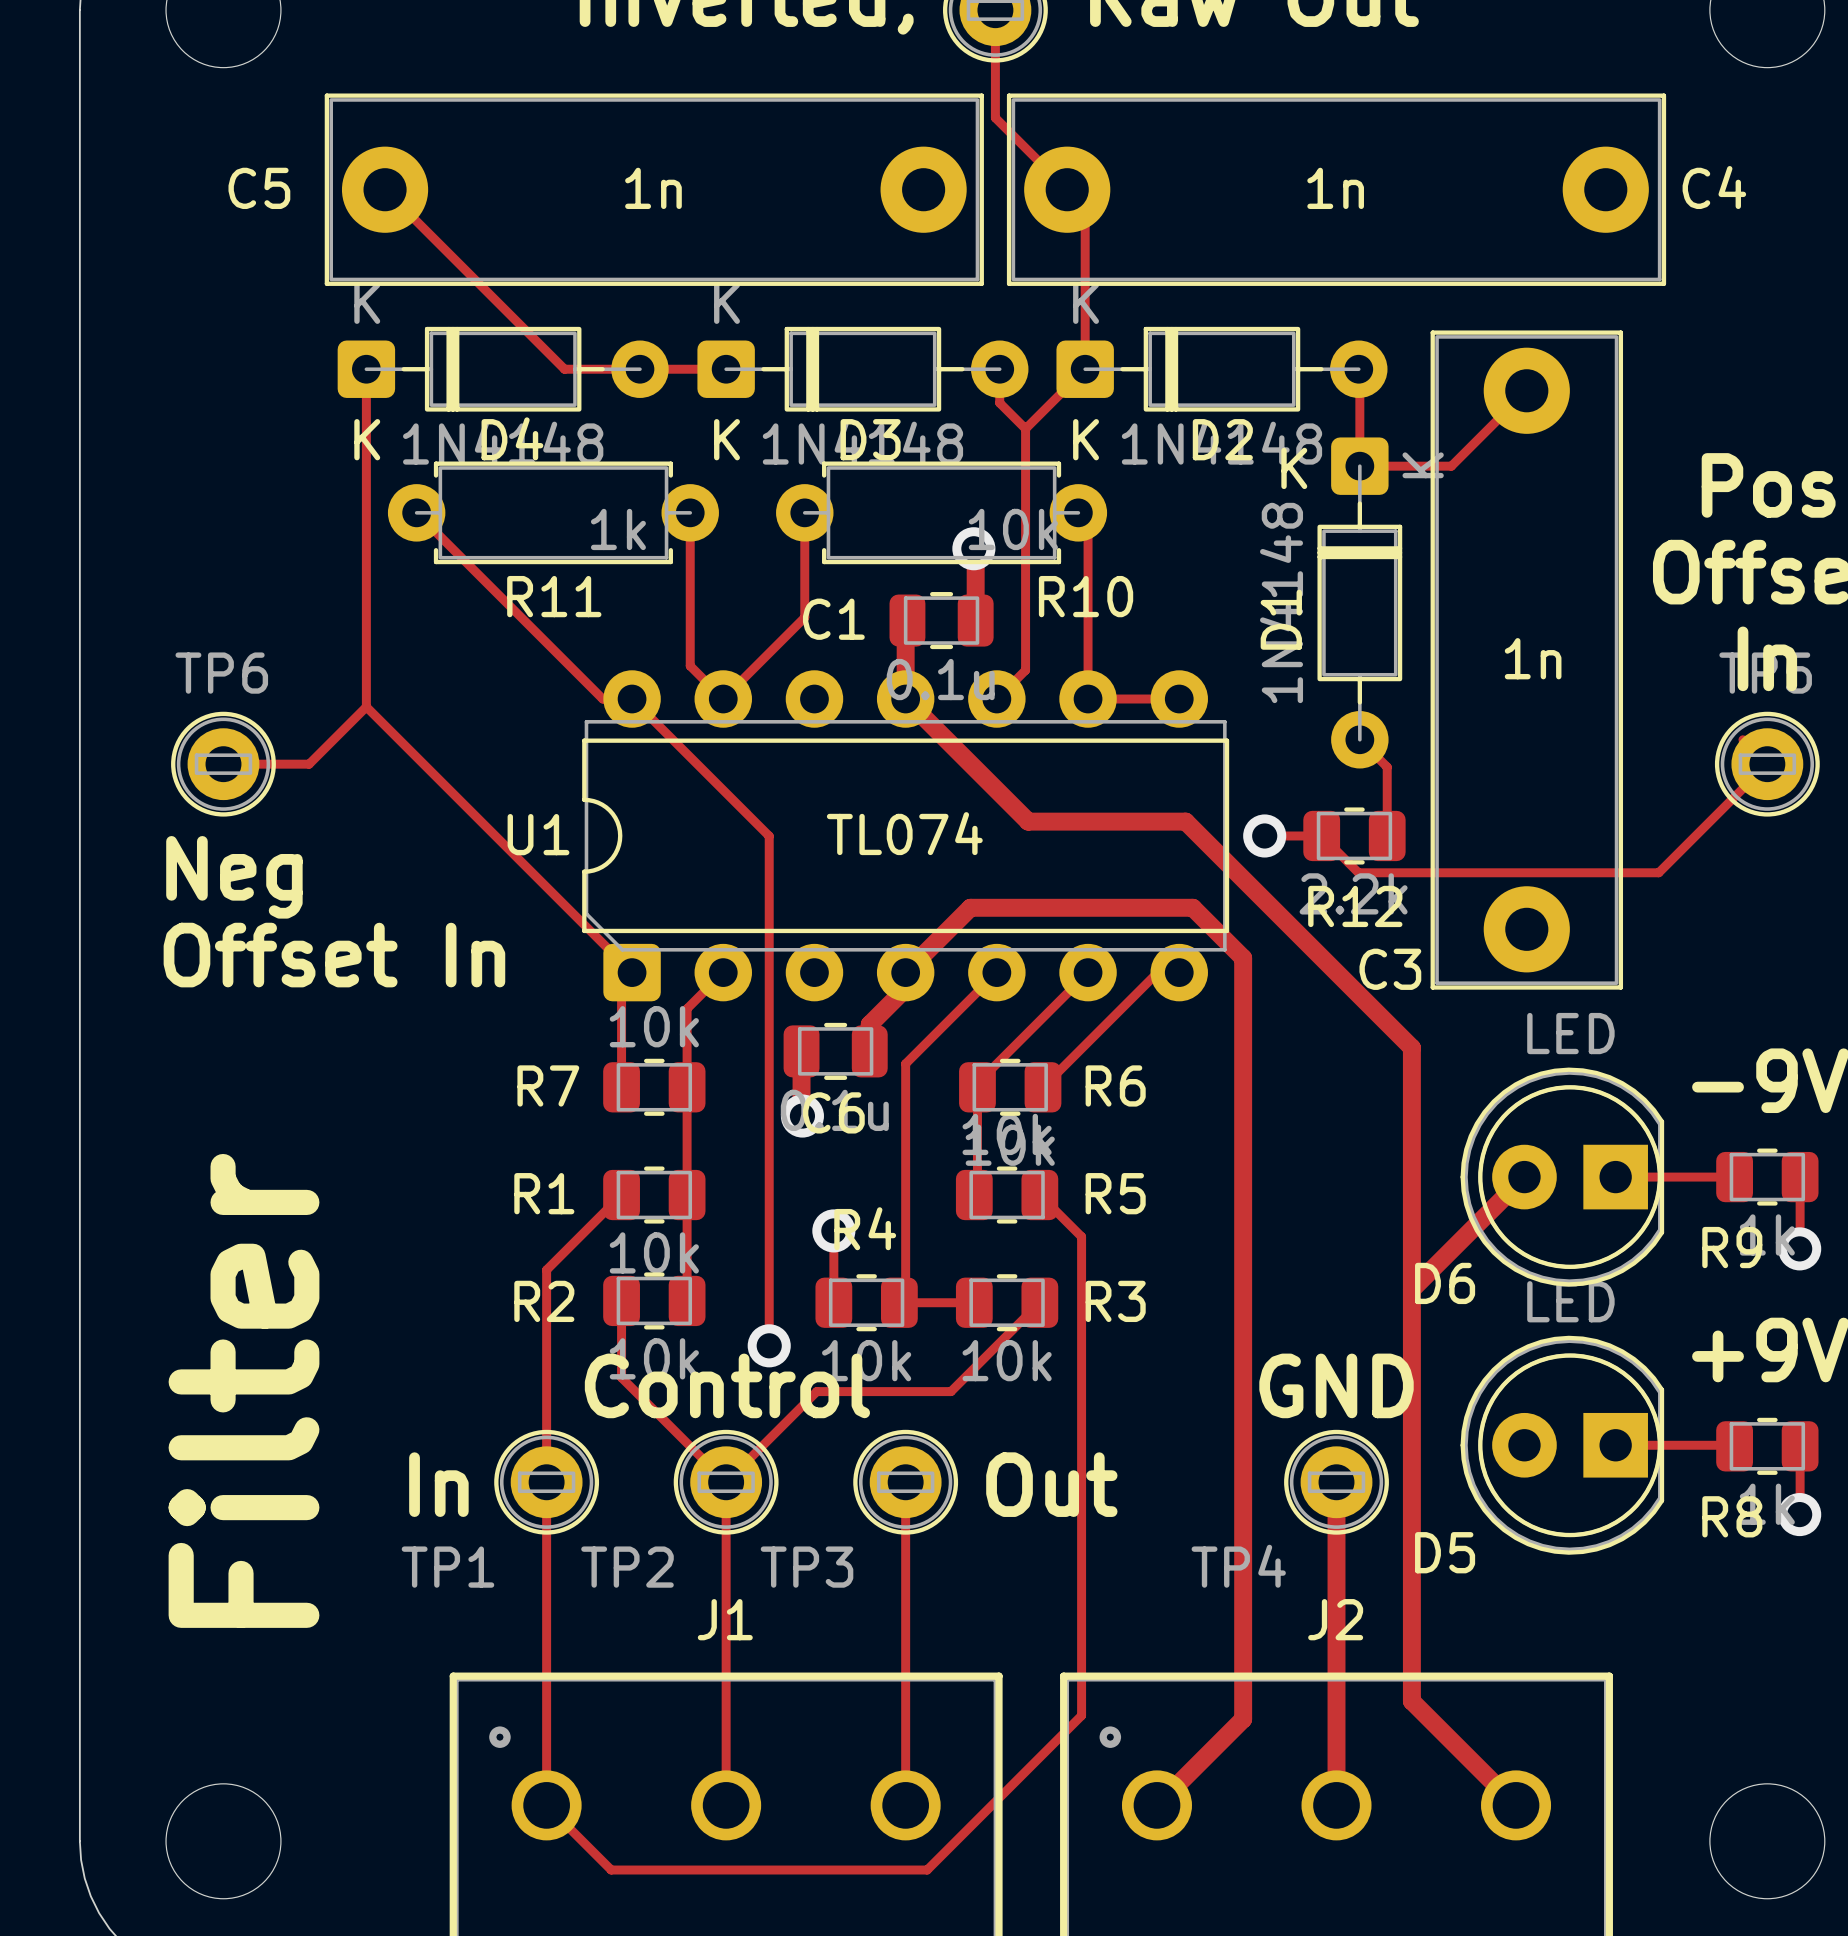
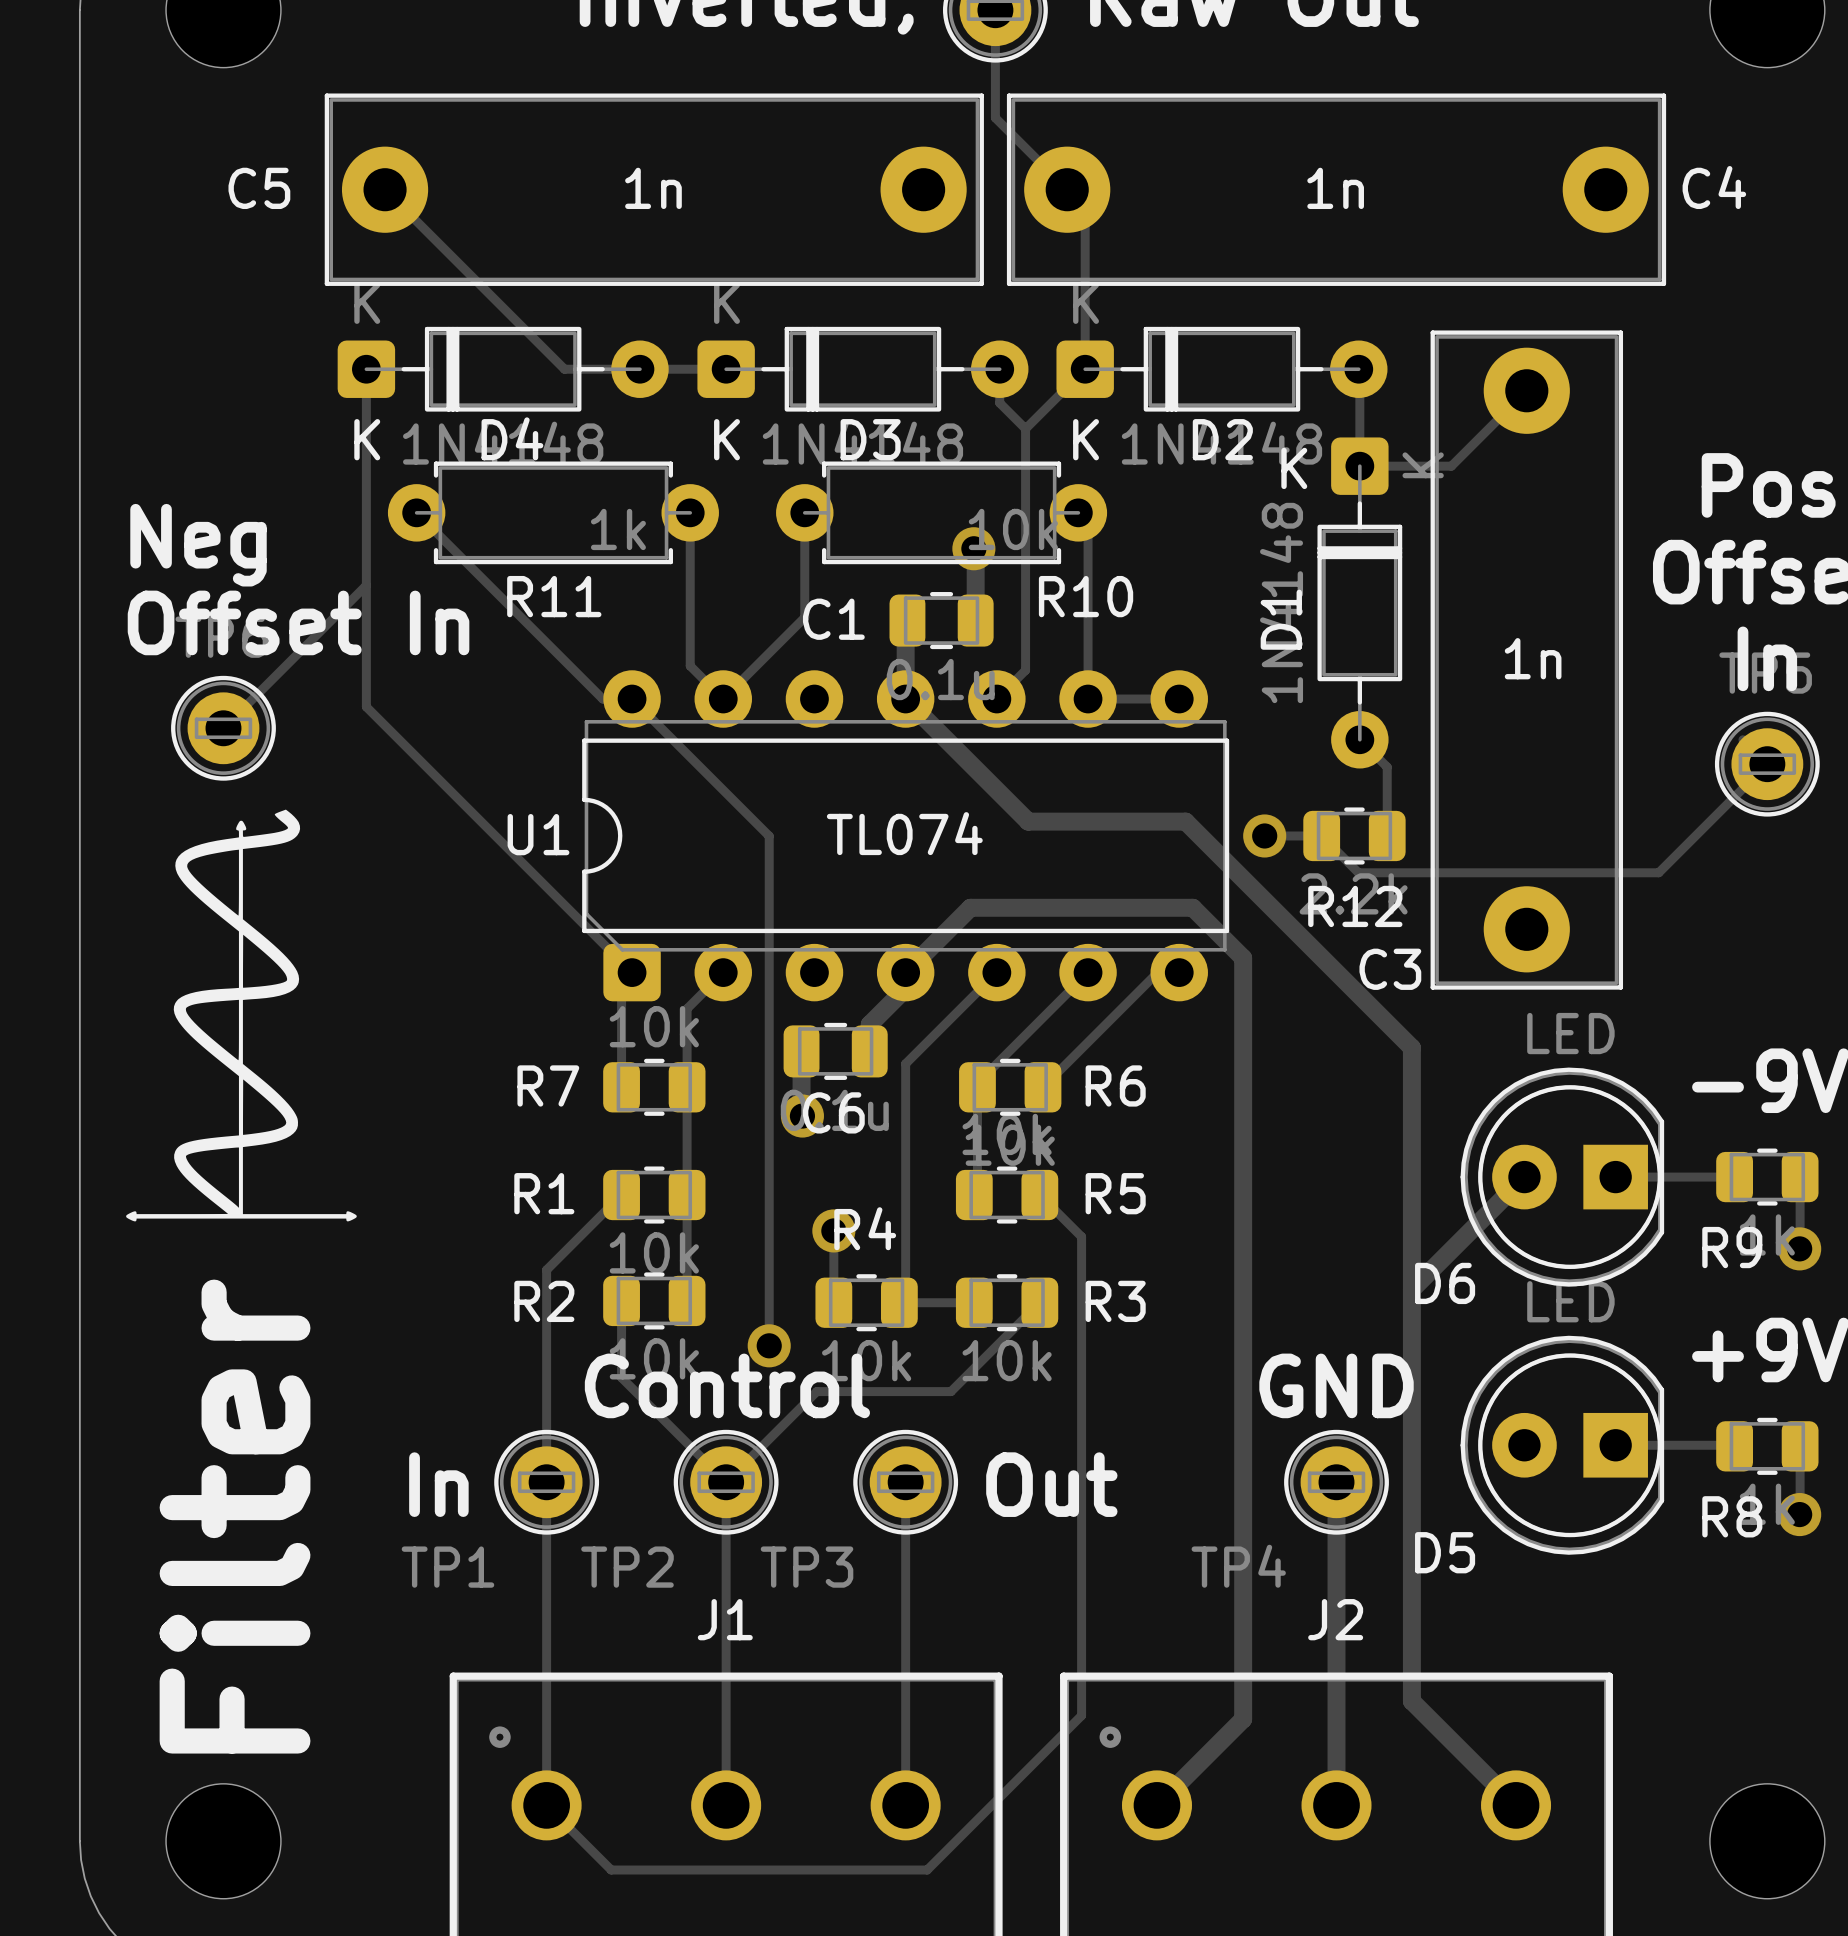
track: none -> (366, 585) (223, 728)
track: (366, 706) (309, 764) (223, 764) -> none
TP6 position: (223, 764) -> (223, 728)
drawing: none -> [126, 809, 357, 1222]
text position: Neg (234, 877) -> Neg (198, 545)
text position: Offset In (334, 955) -> Offset In (298, 622)
text position: Filter (244, 1390) -> Filter (235, 1516)

